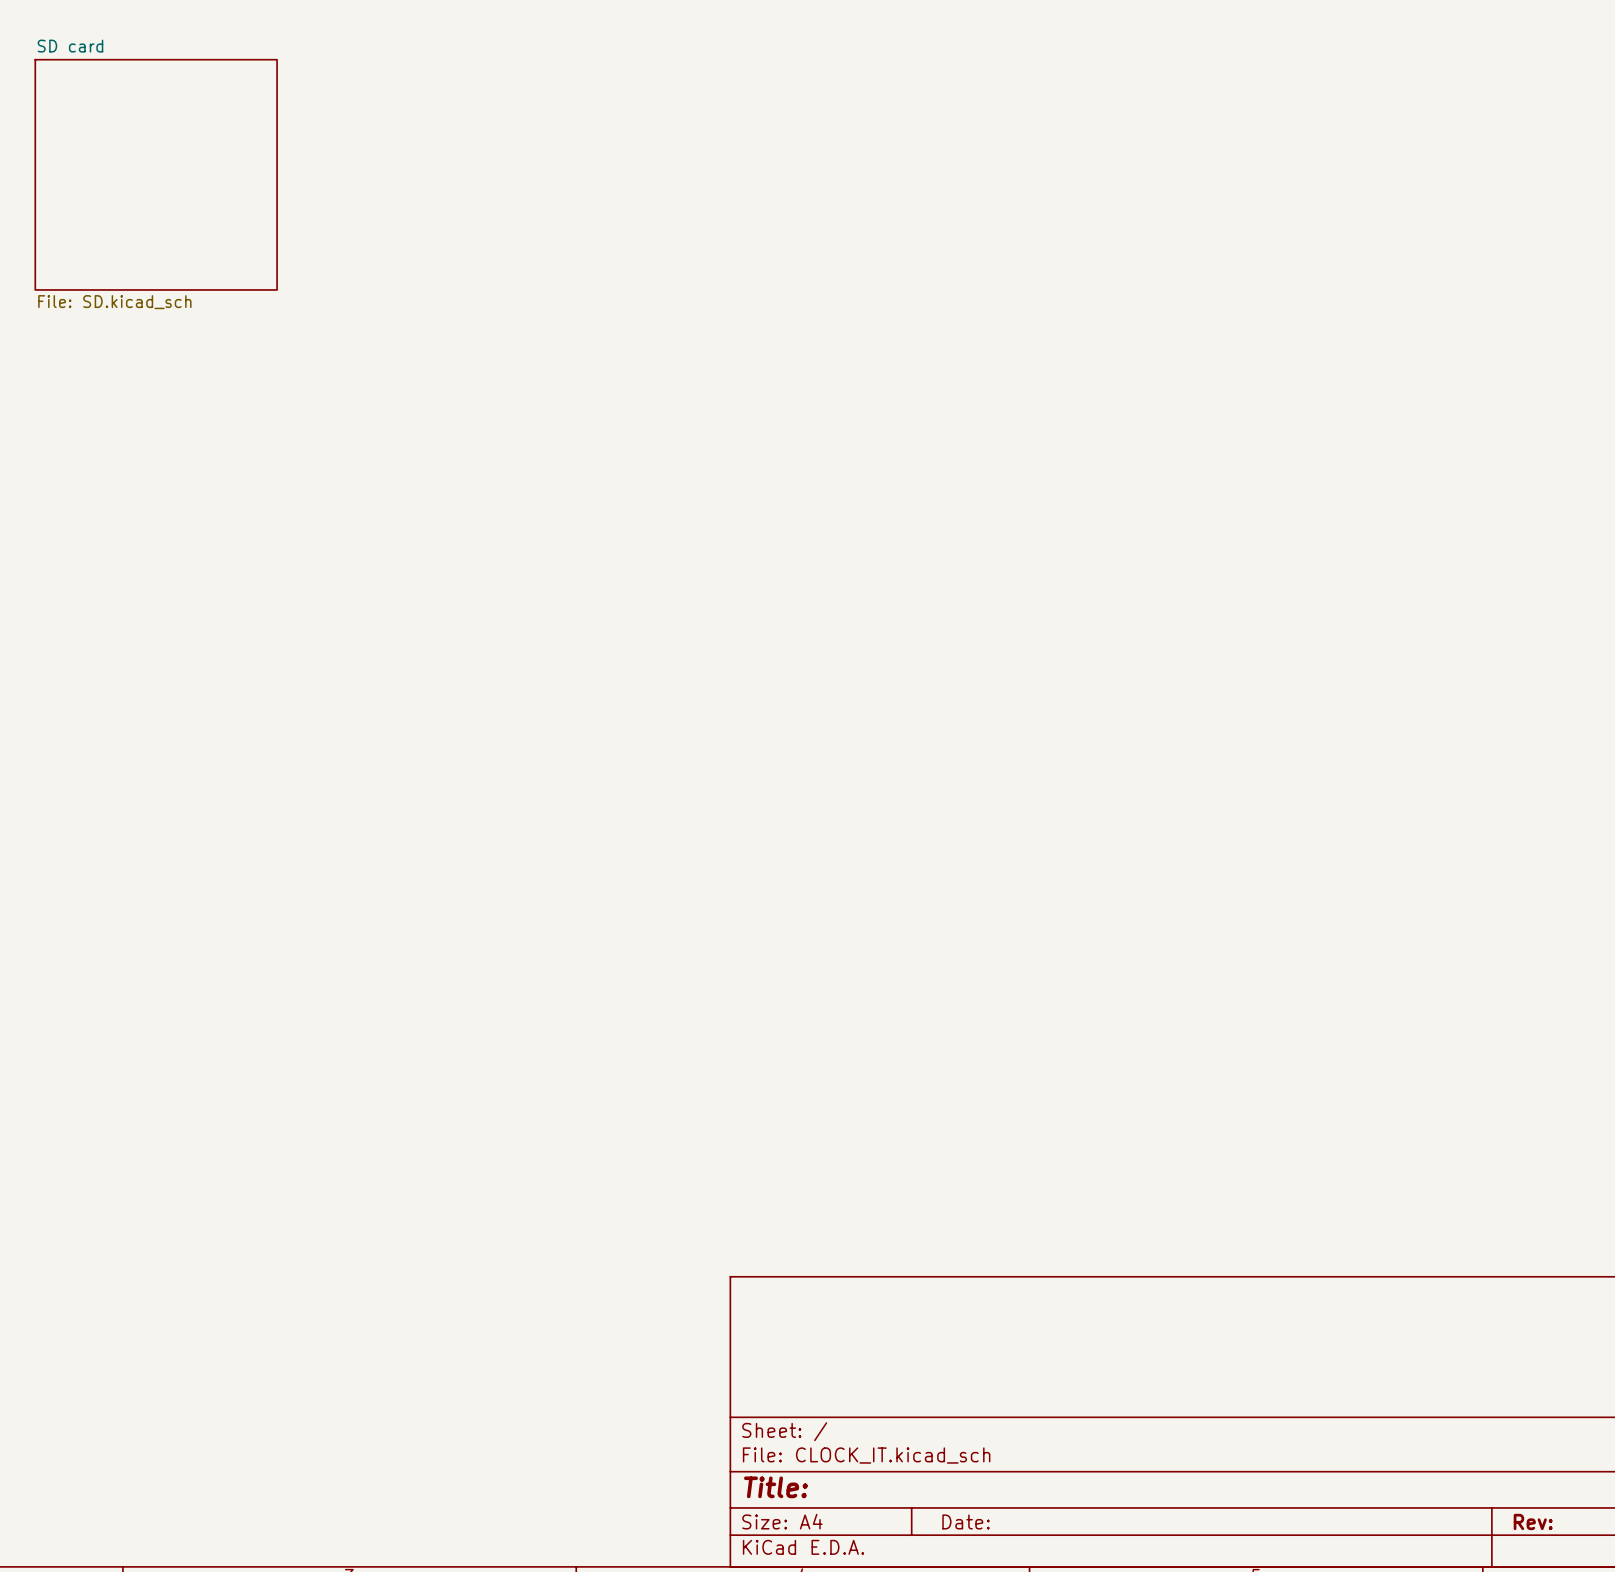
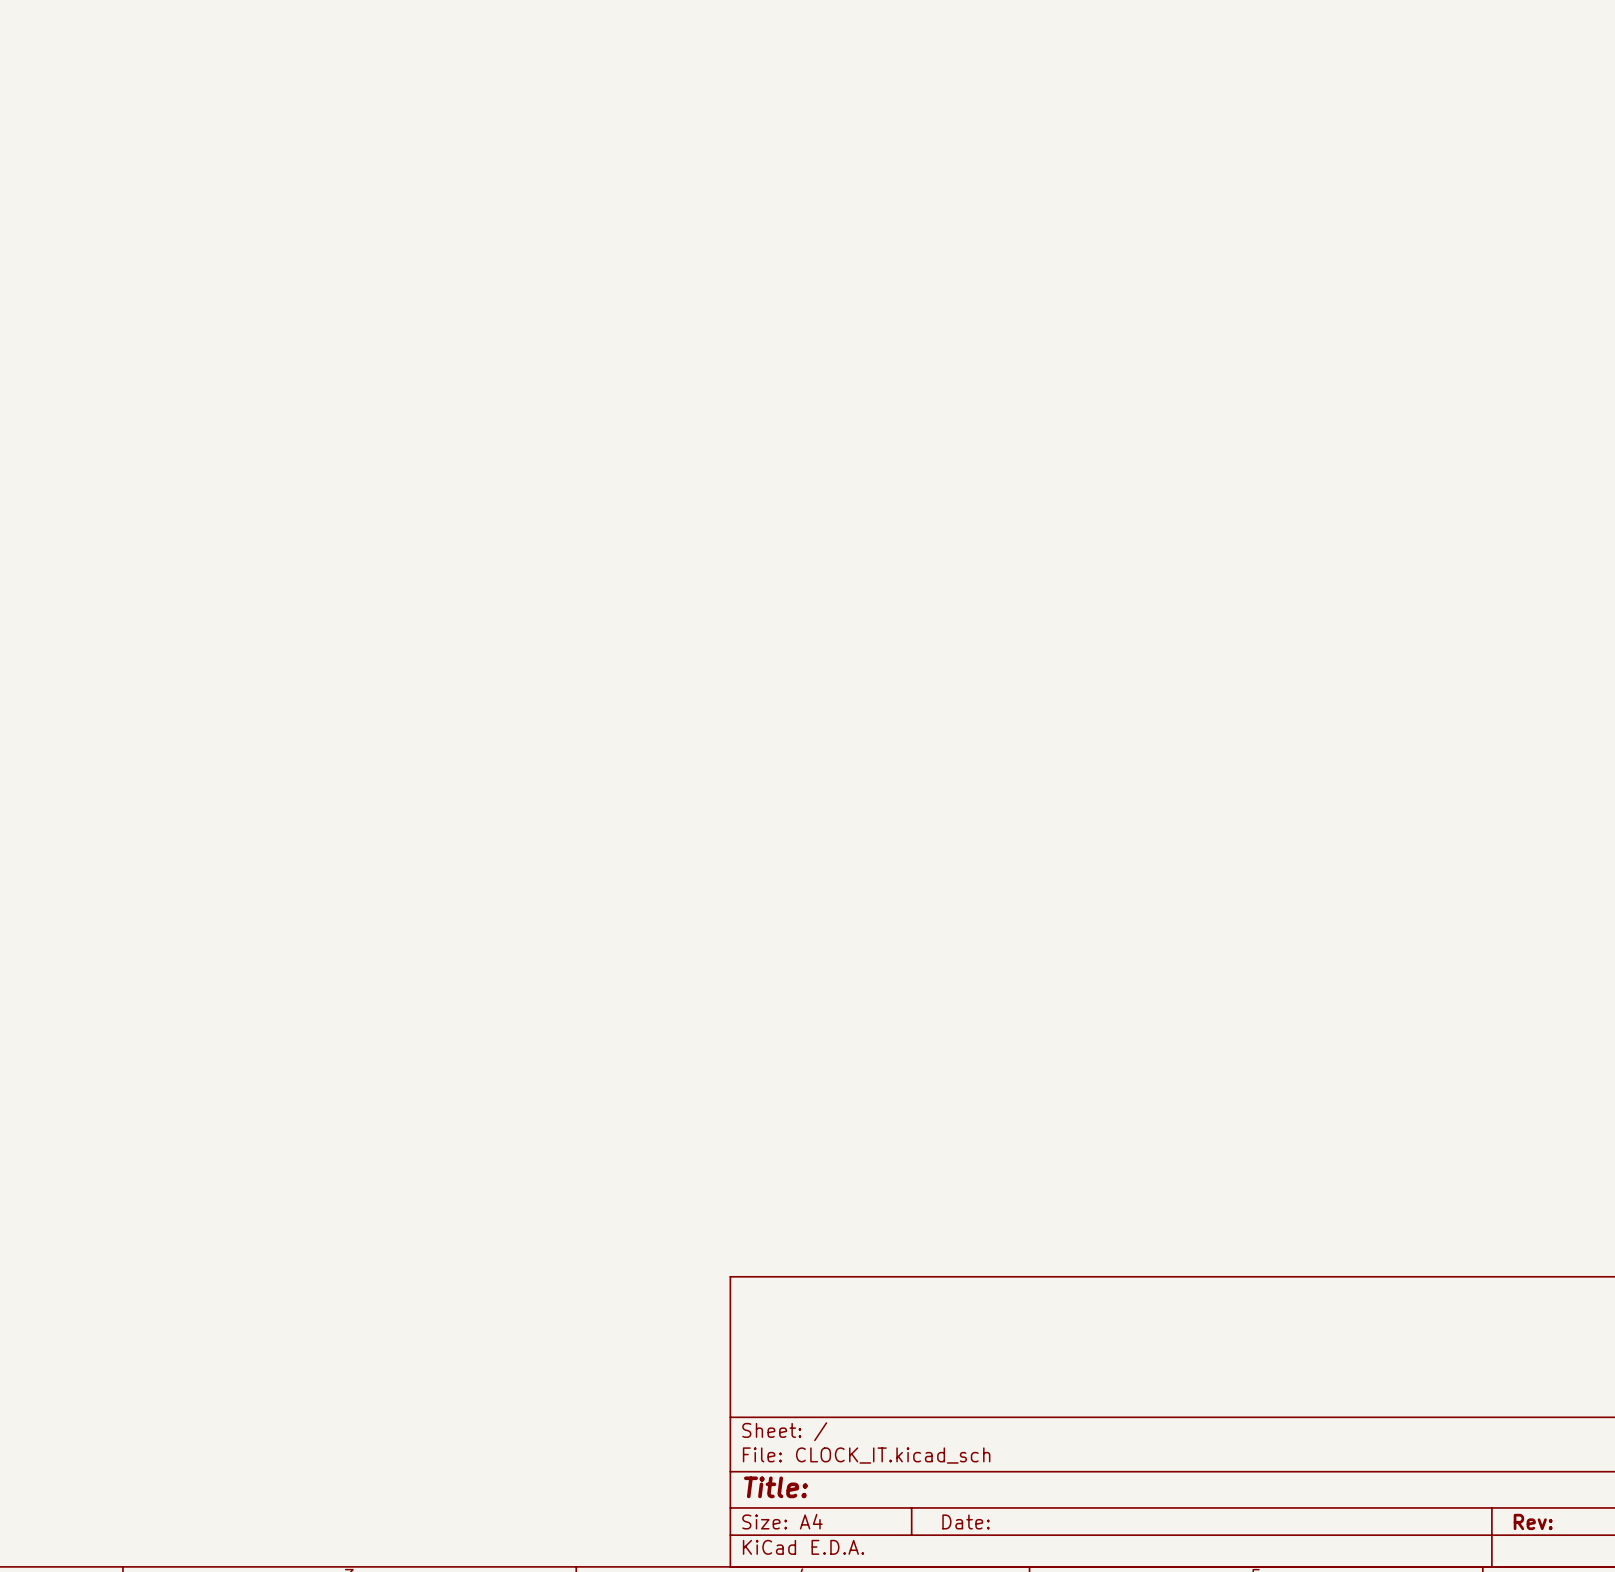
sheet SD card: File: SD.kicad_sch (156, 174) -> none

